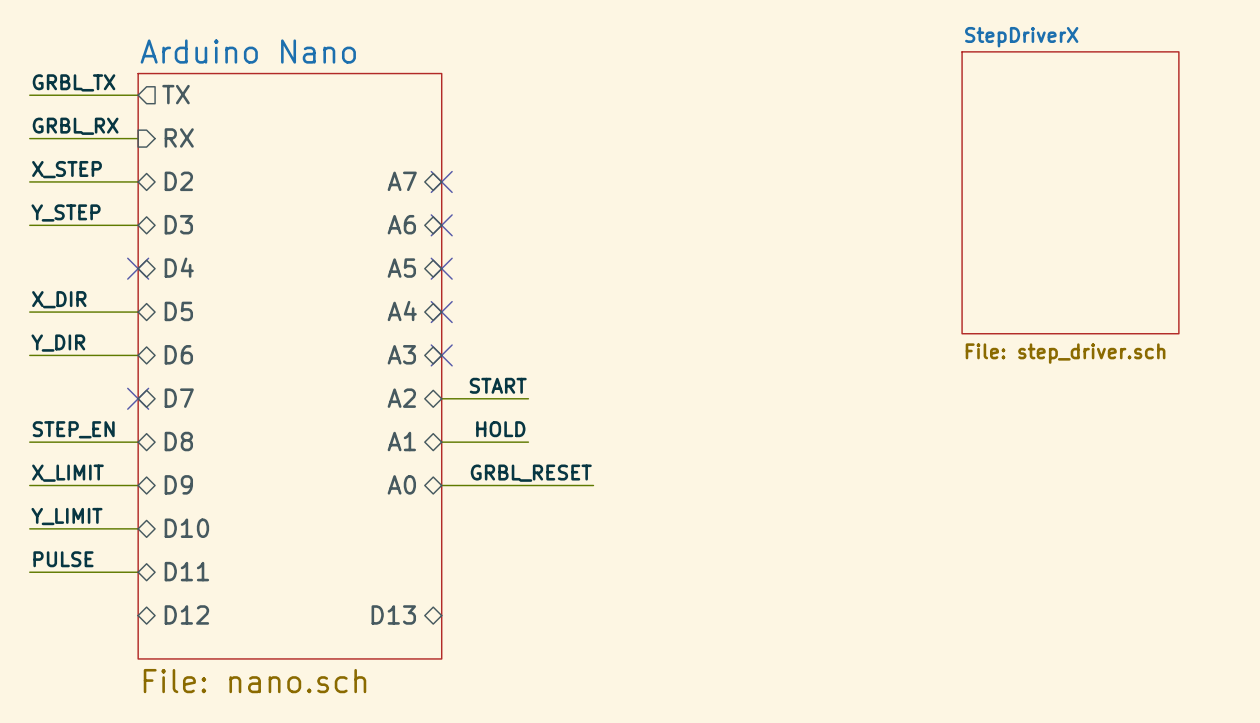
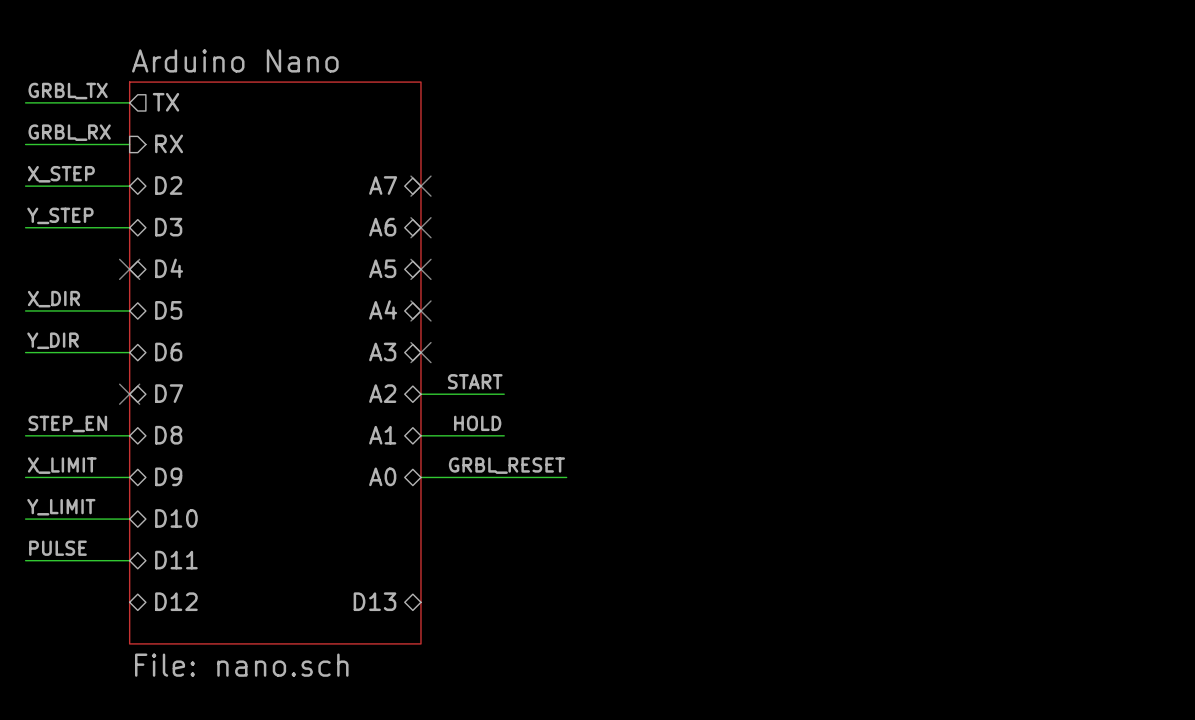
sheet StepDriverX: File: step_driver.sch (1070, 192) -> none

